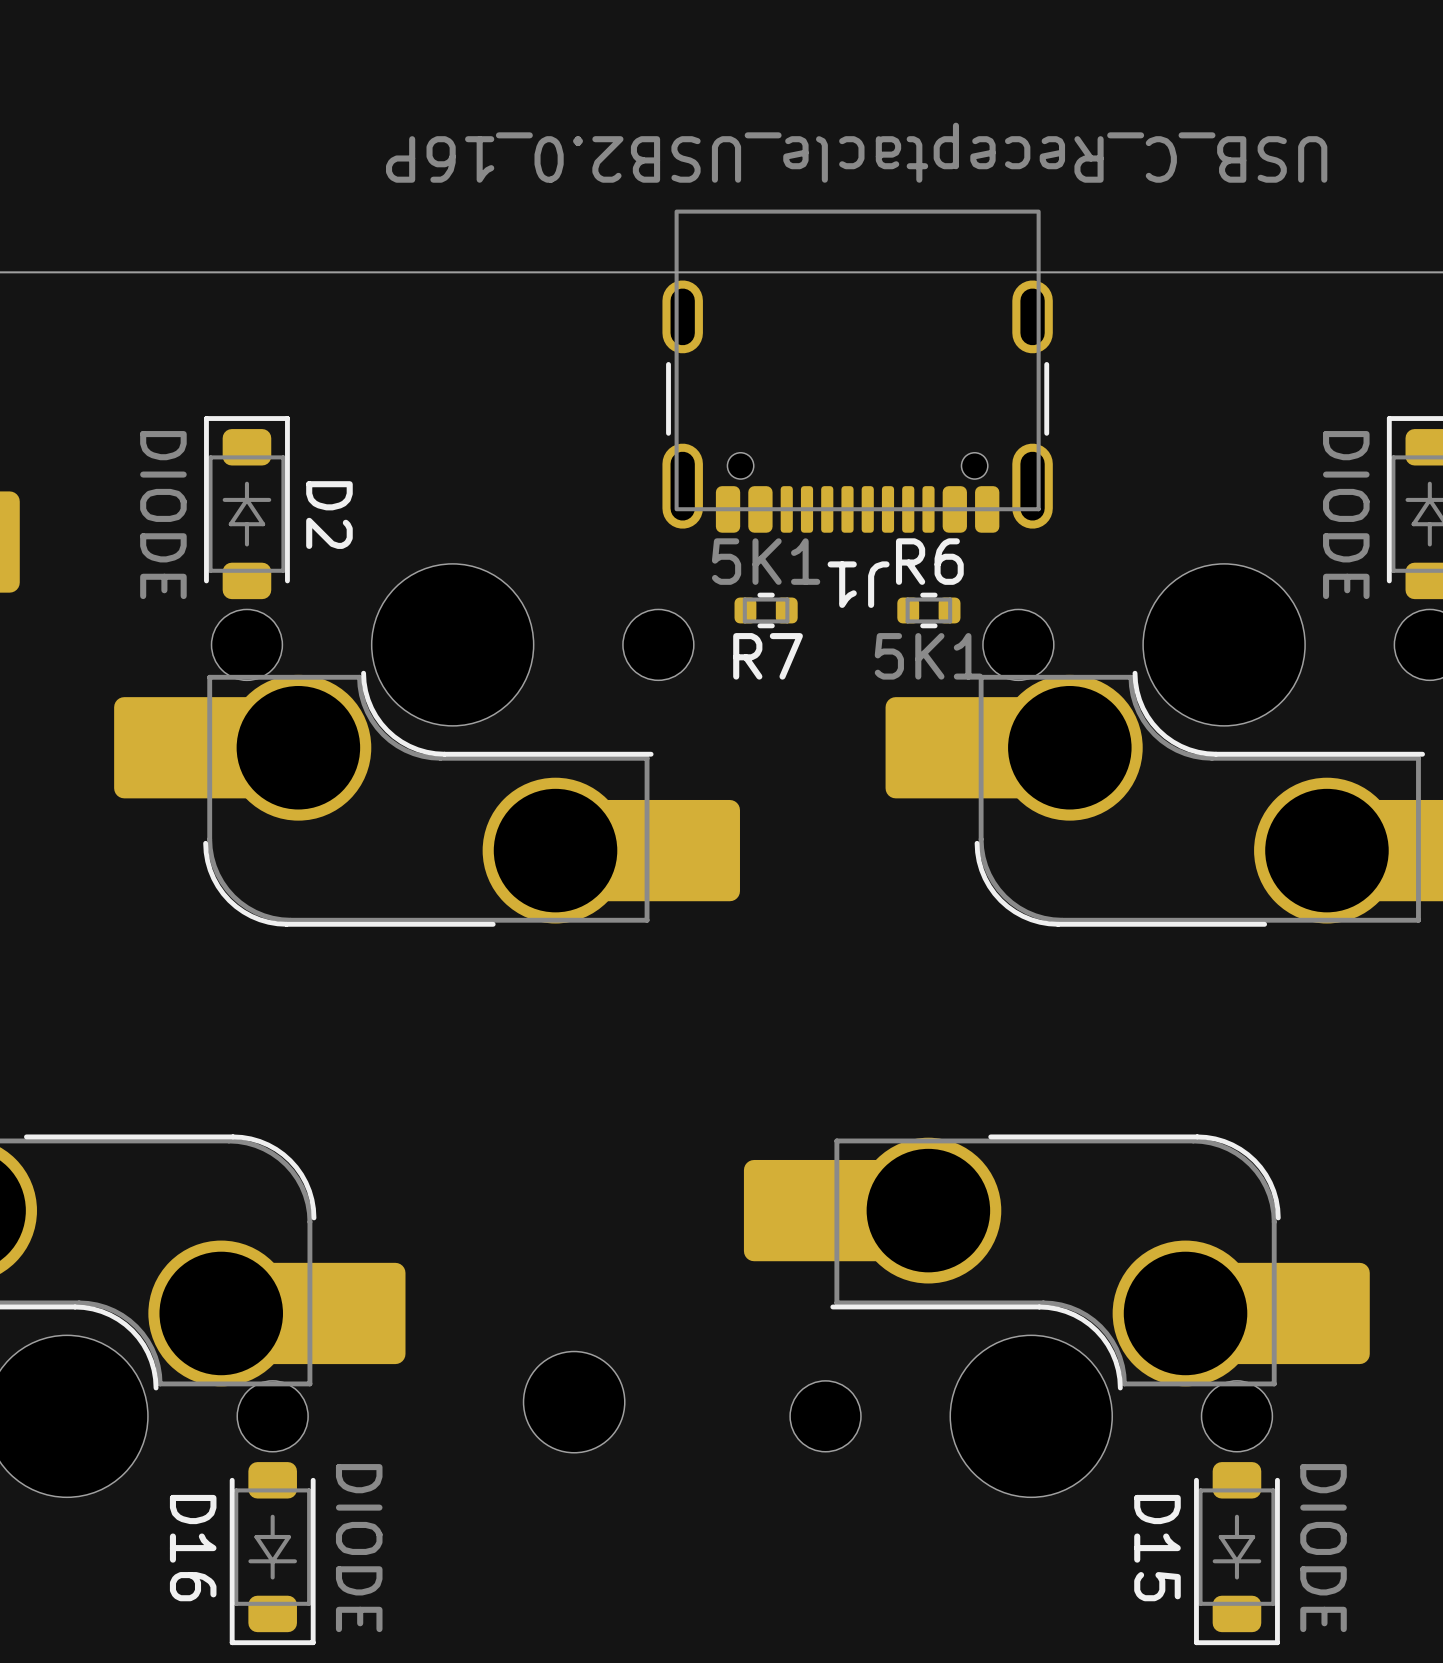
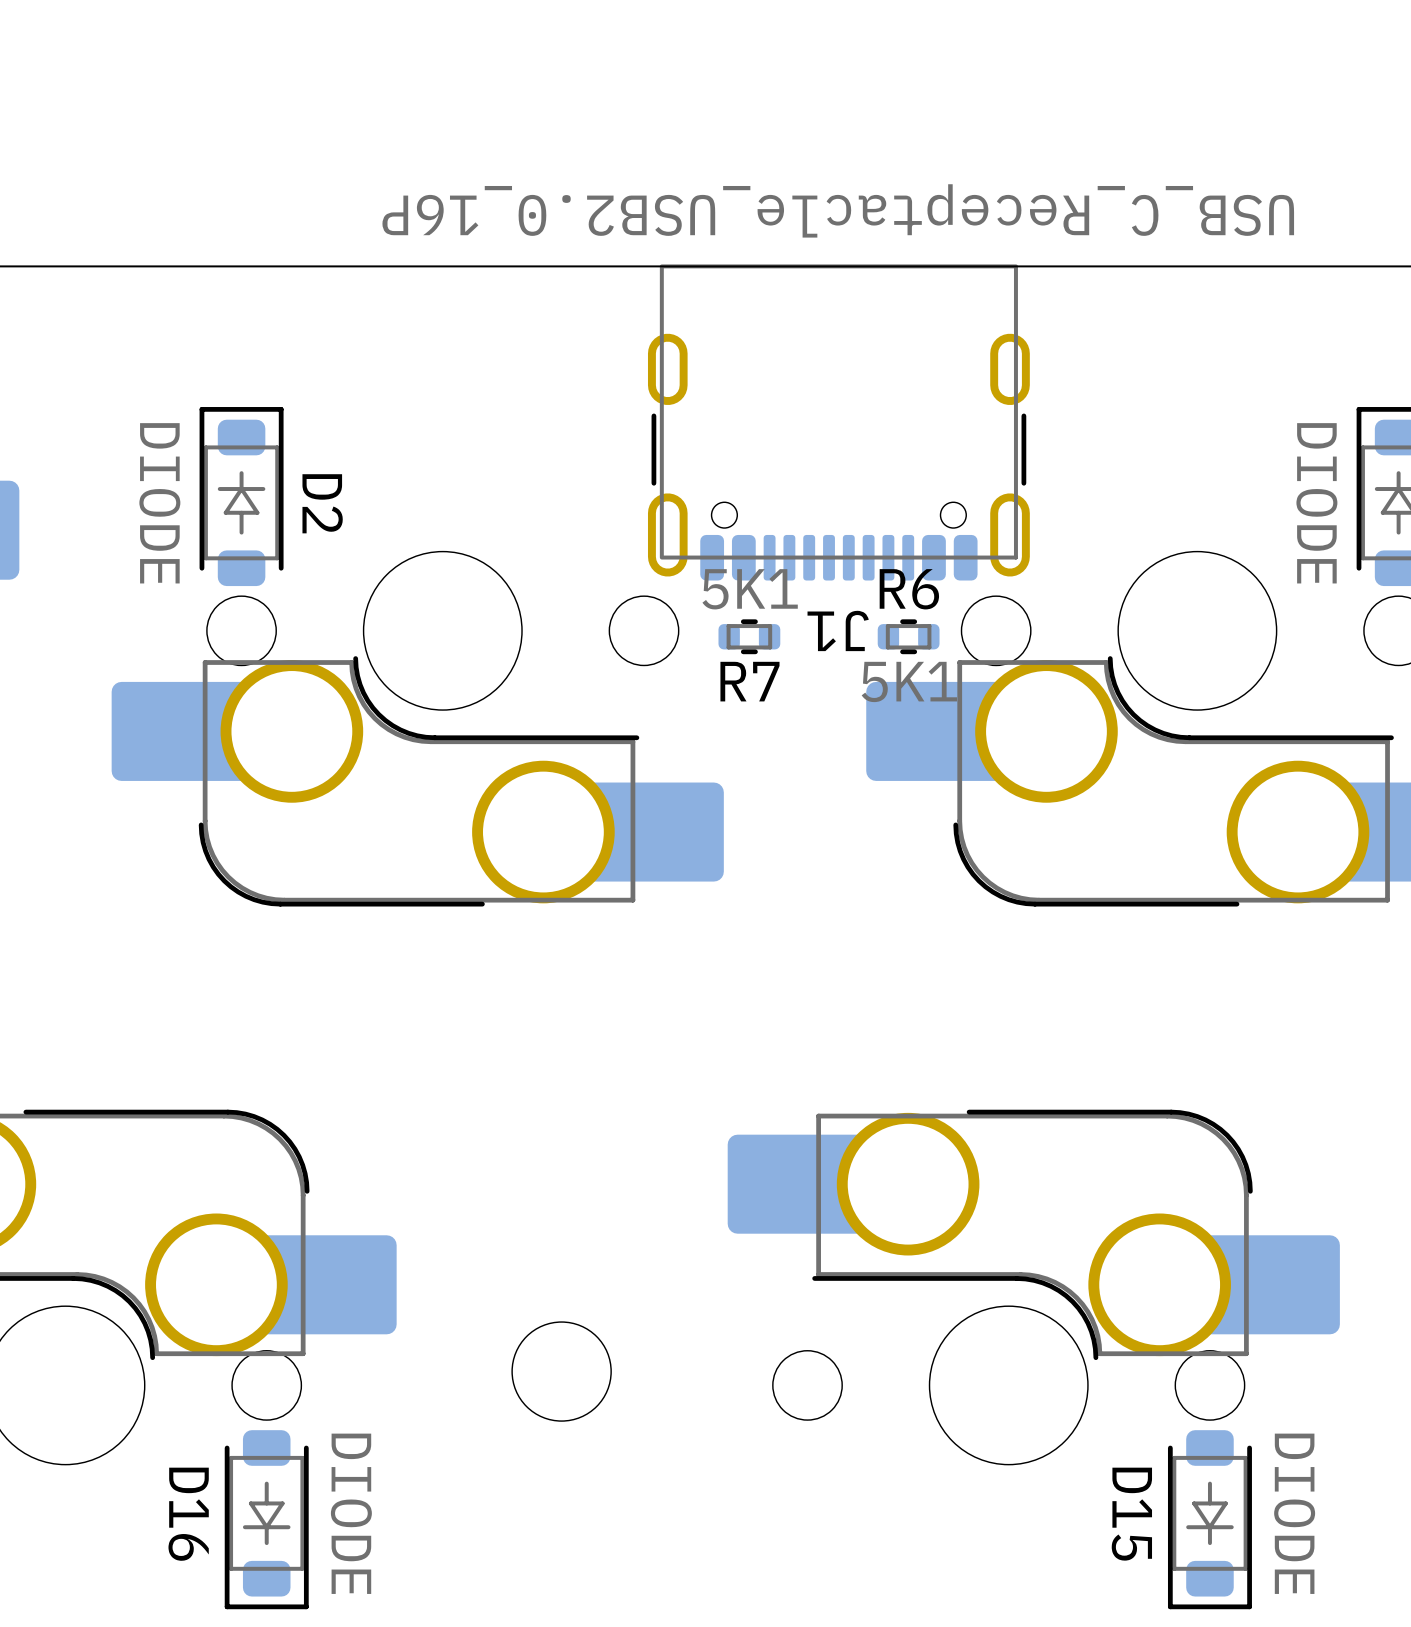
J1 position: (857, 371) -> (838, 422)
R7 position: (766, 610) -> (749, 636)
R6 position: (928, 610) -> (908, 636)

